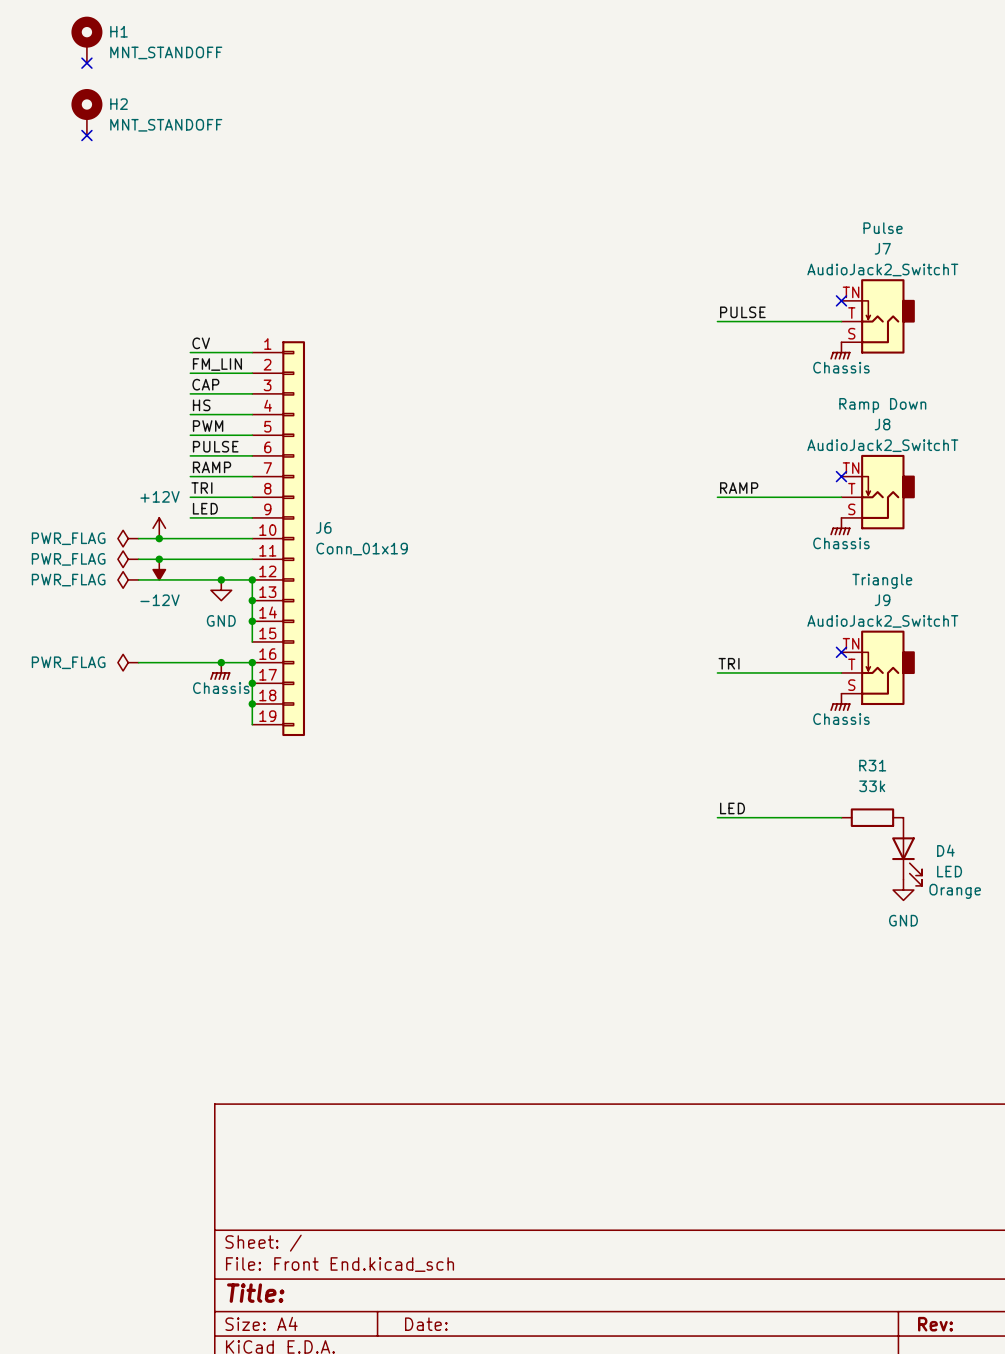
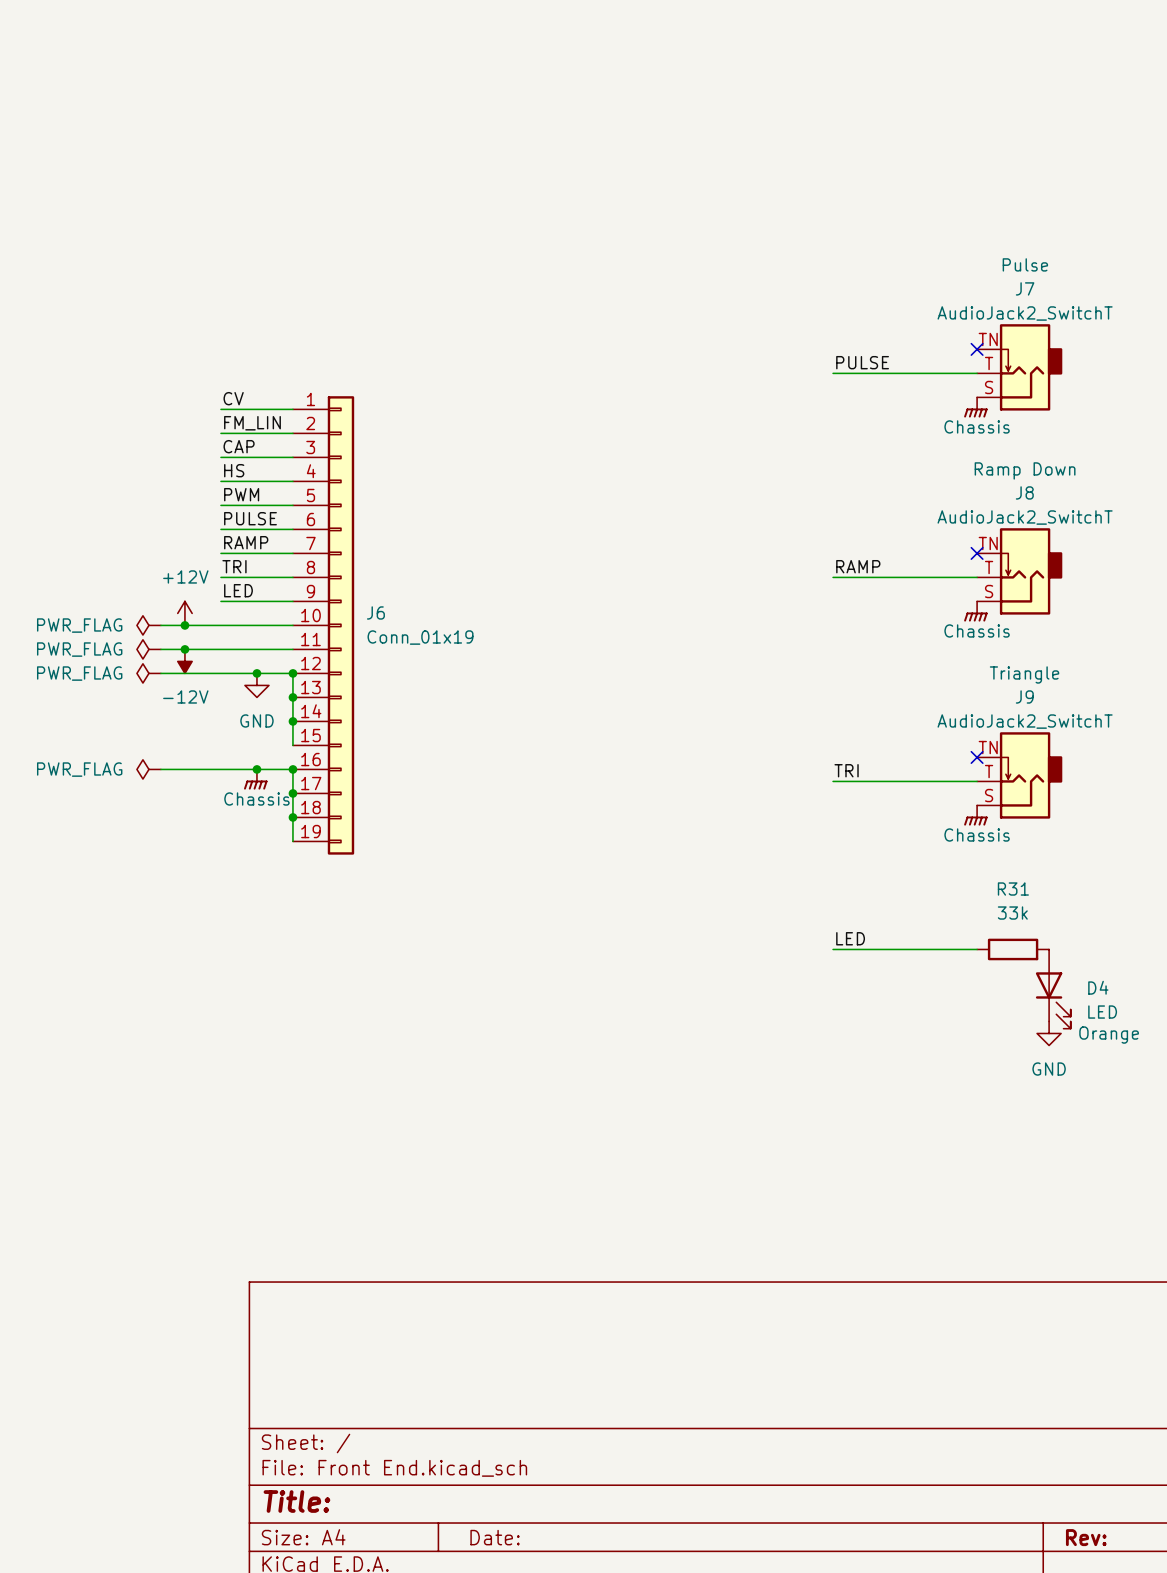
H1: MNT_STANDOFF (86, 39) -> none
no-connect mark: (86, 63) -> none
H2: MNT_STANDOFF (86, 112) -> none
no-connect mark: (86, 135) -> none

